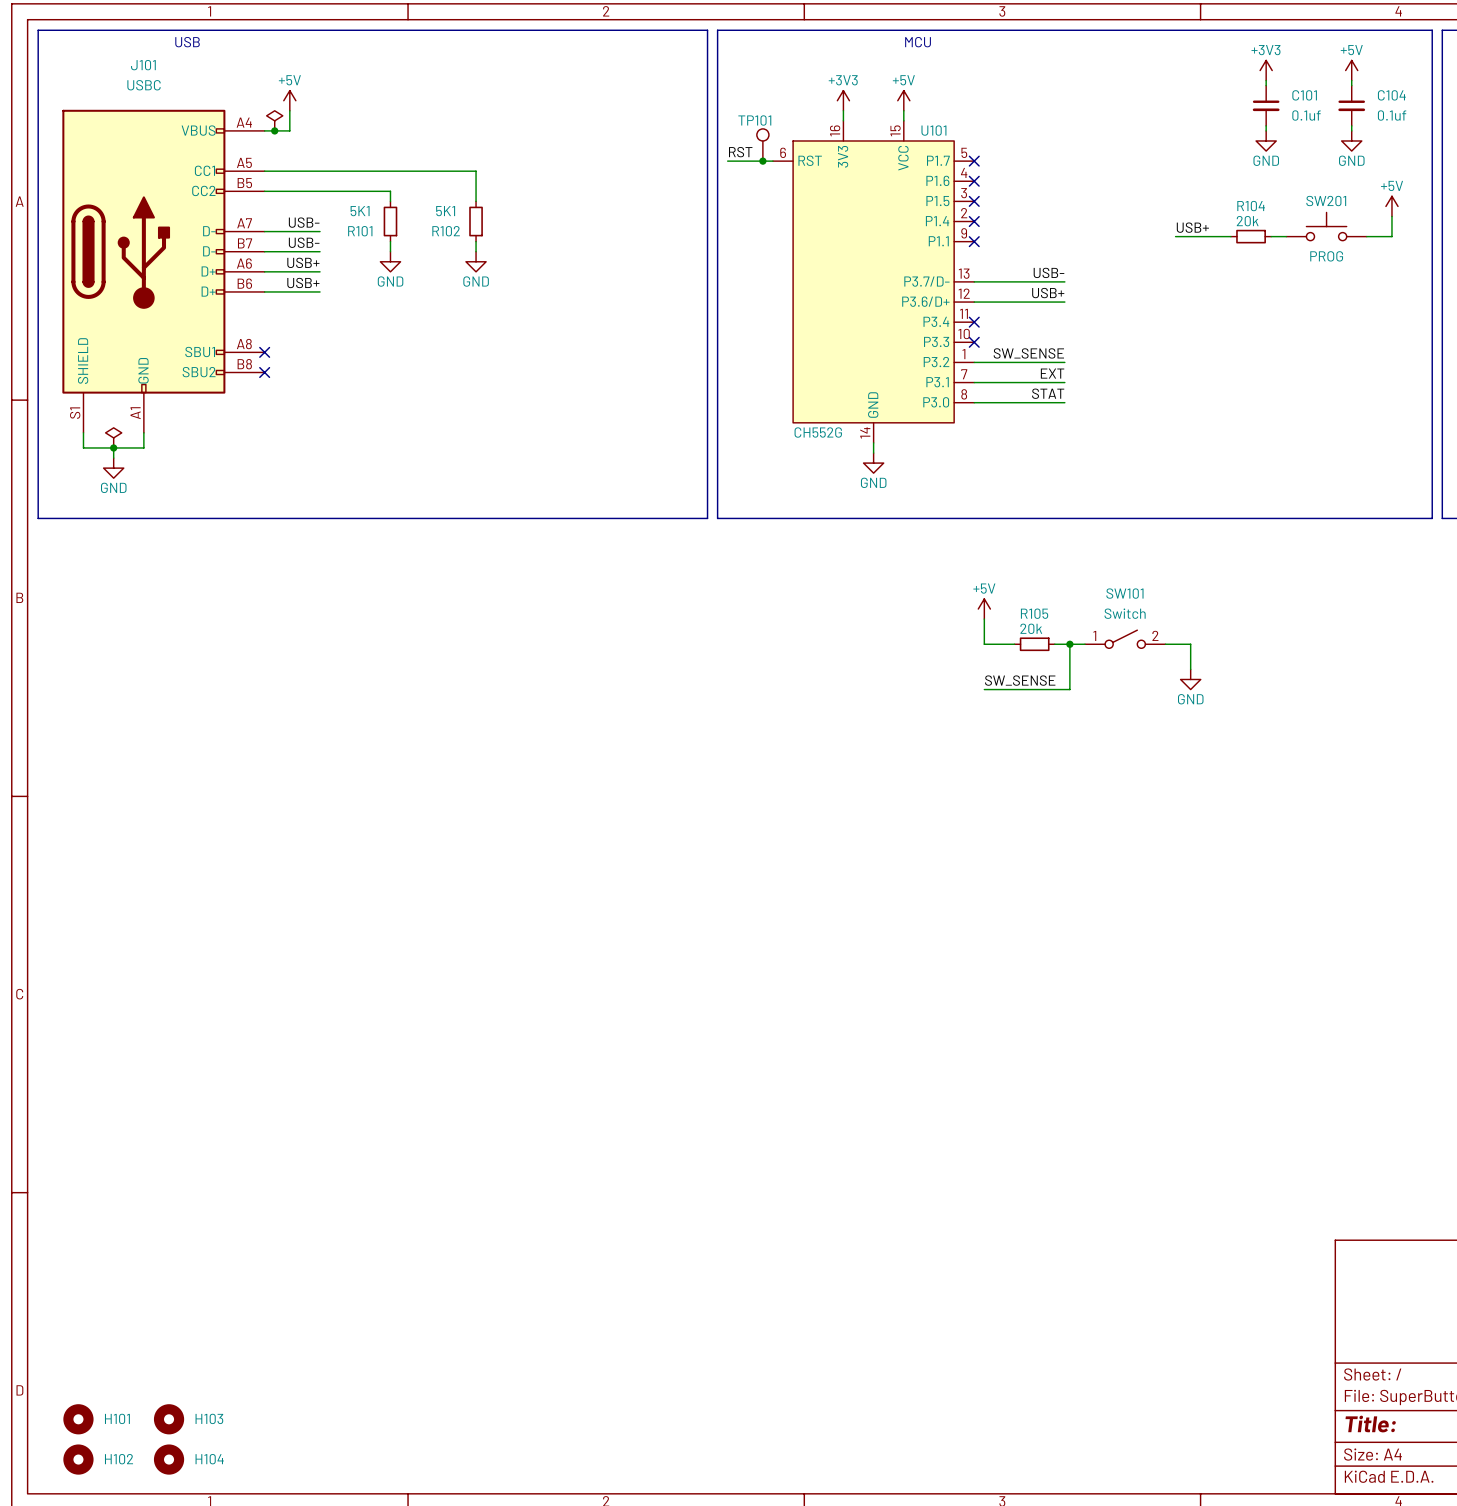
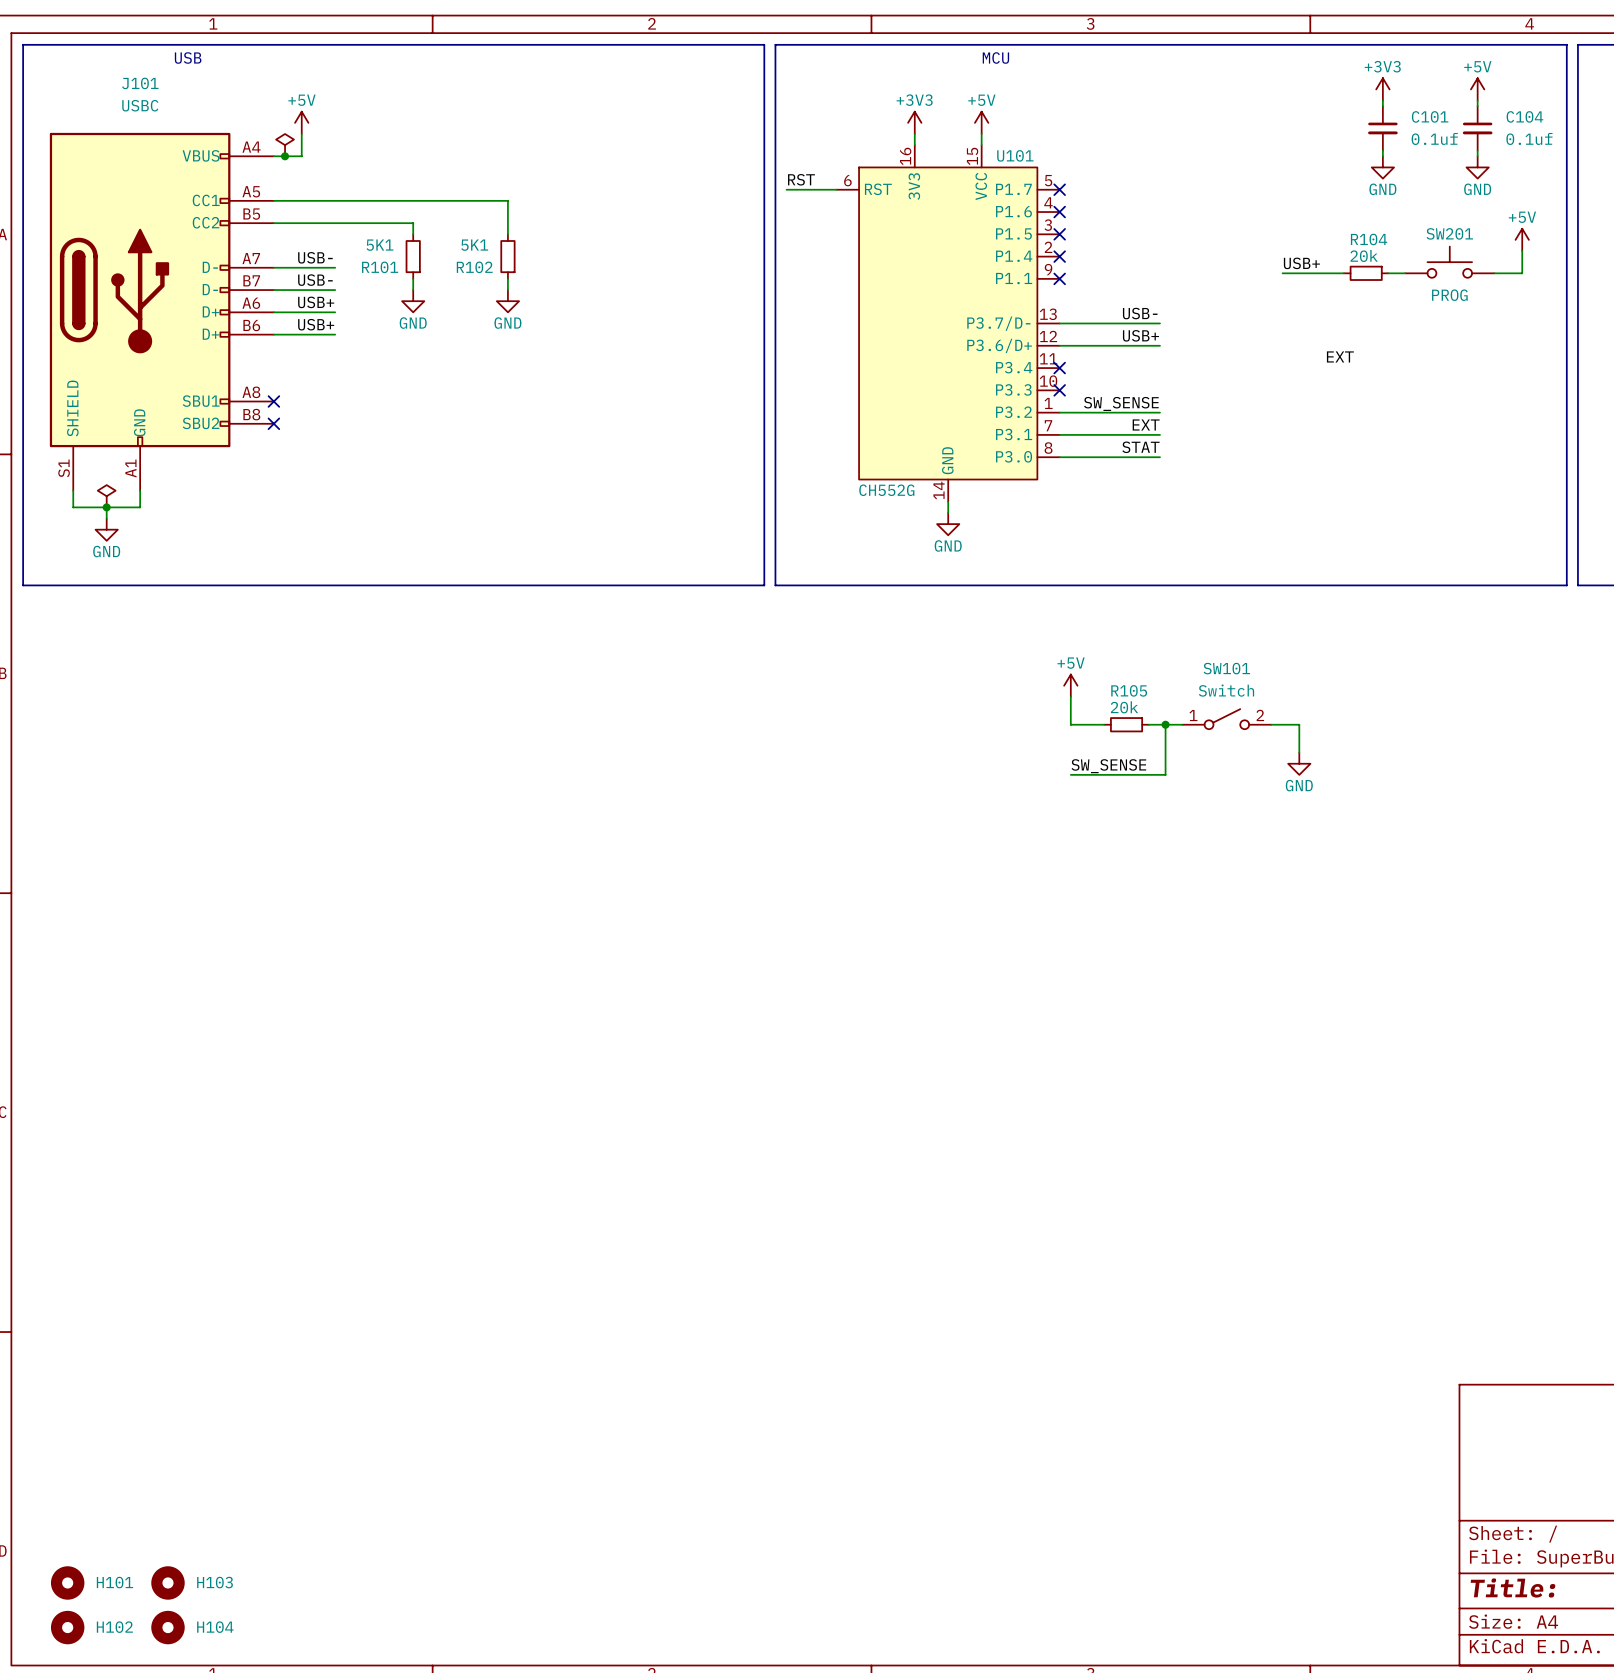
TP101: (762, 145) -> none
junction: (762, 161) -> none
label: none -> EXT (1340, 356)

